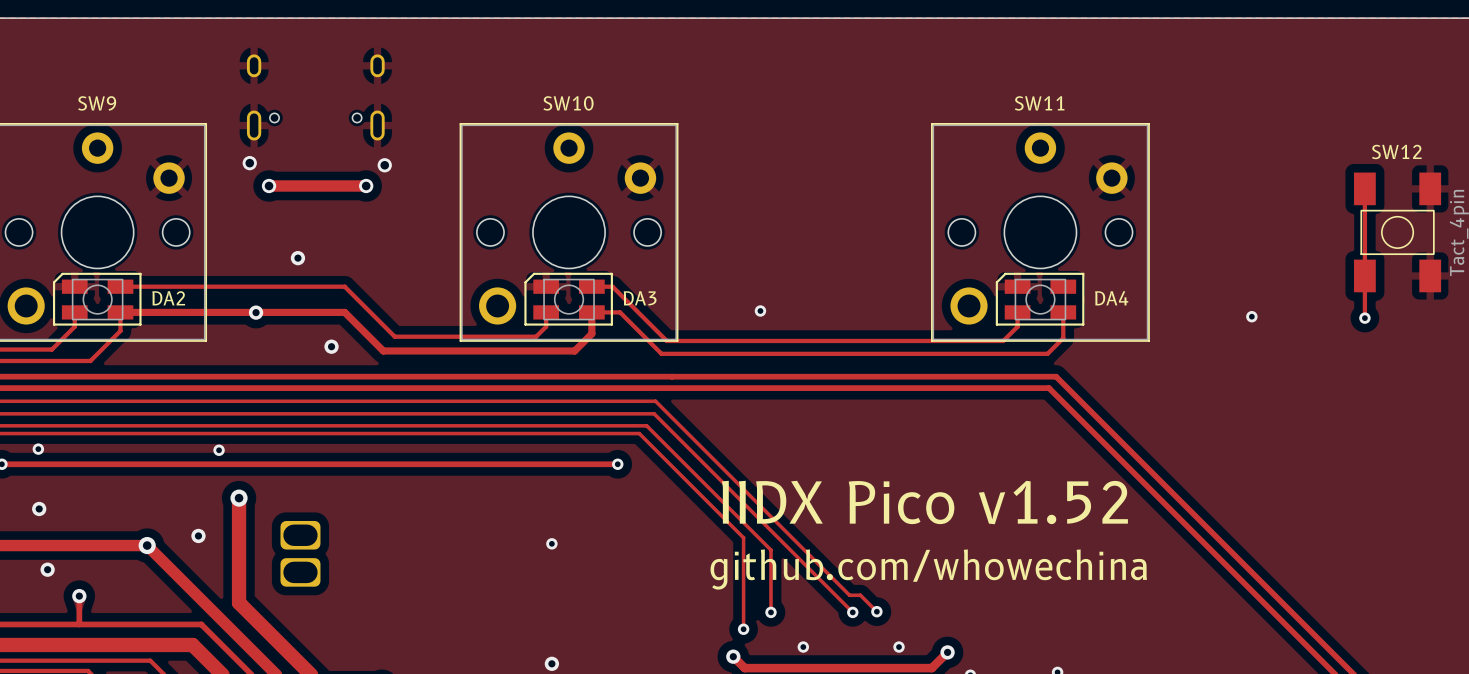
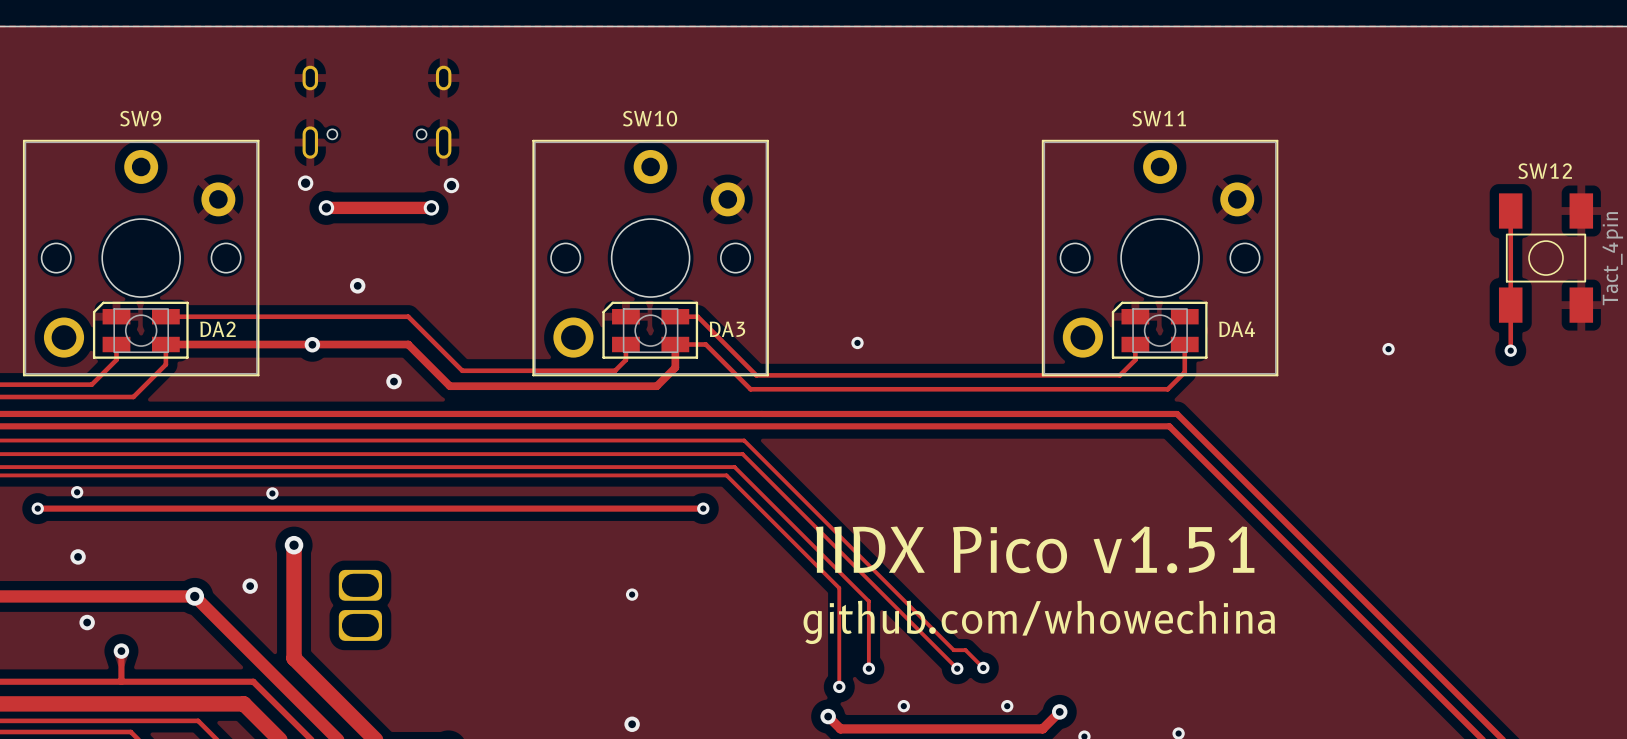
text: IIDX Pico v1.52 (924, 502) -> IIDX Pico v1.51 (1035, 549)

